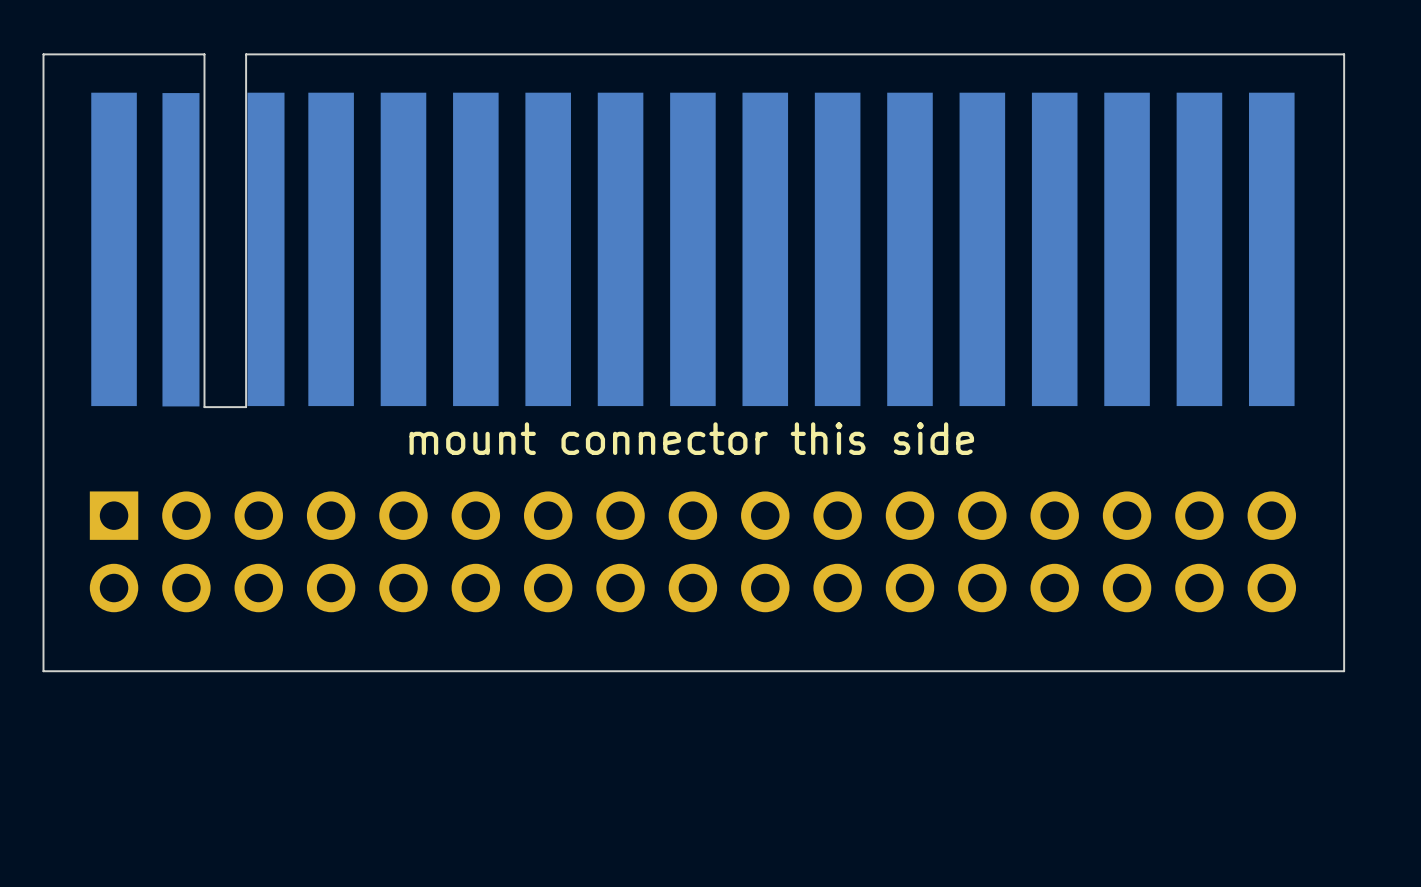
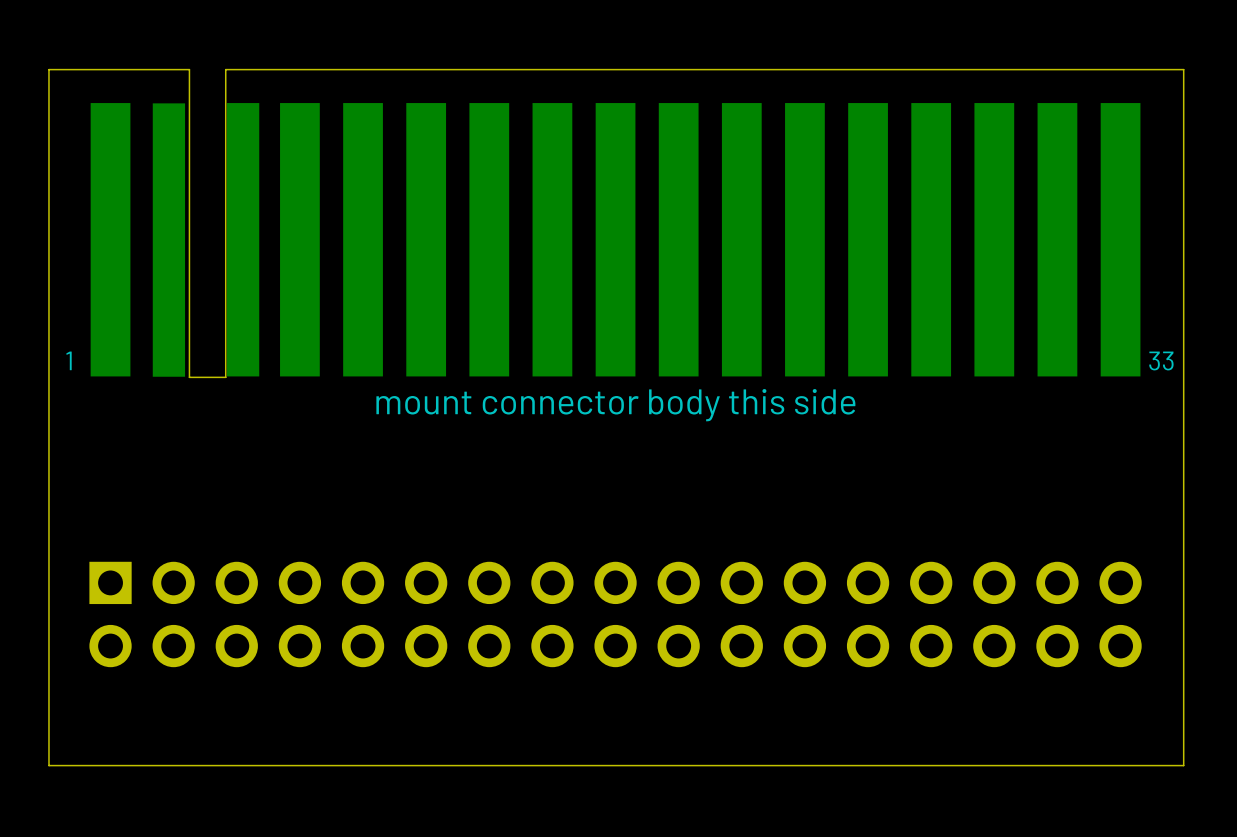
text: none -> 1 (69, 360)
text: none -> 33 (1161, 360)
text: mount connector this side (691, 438) -> mount connector body this side (615, 405)
part position: (692, 551) -> (615, 614)
board edge: (1344, 671) (43, 671) -> (1183, 607) (1183, 765) (48, 765) (48, 607)

